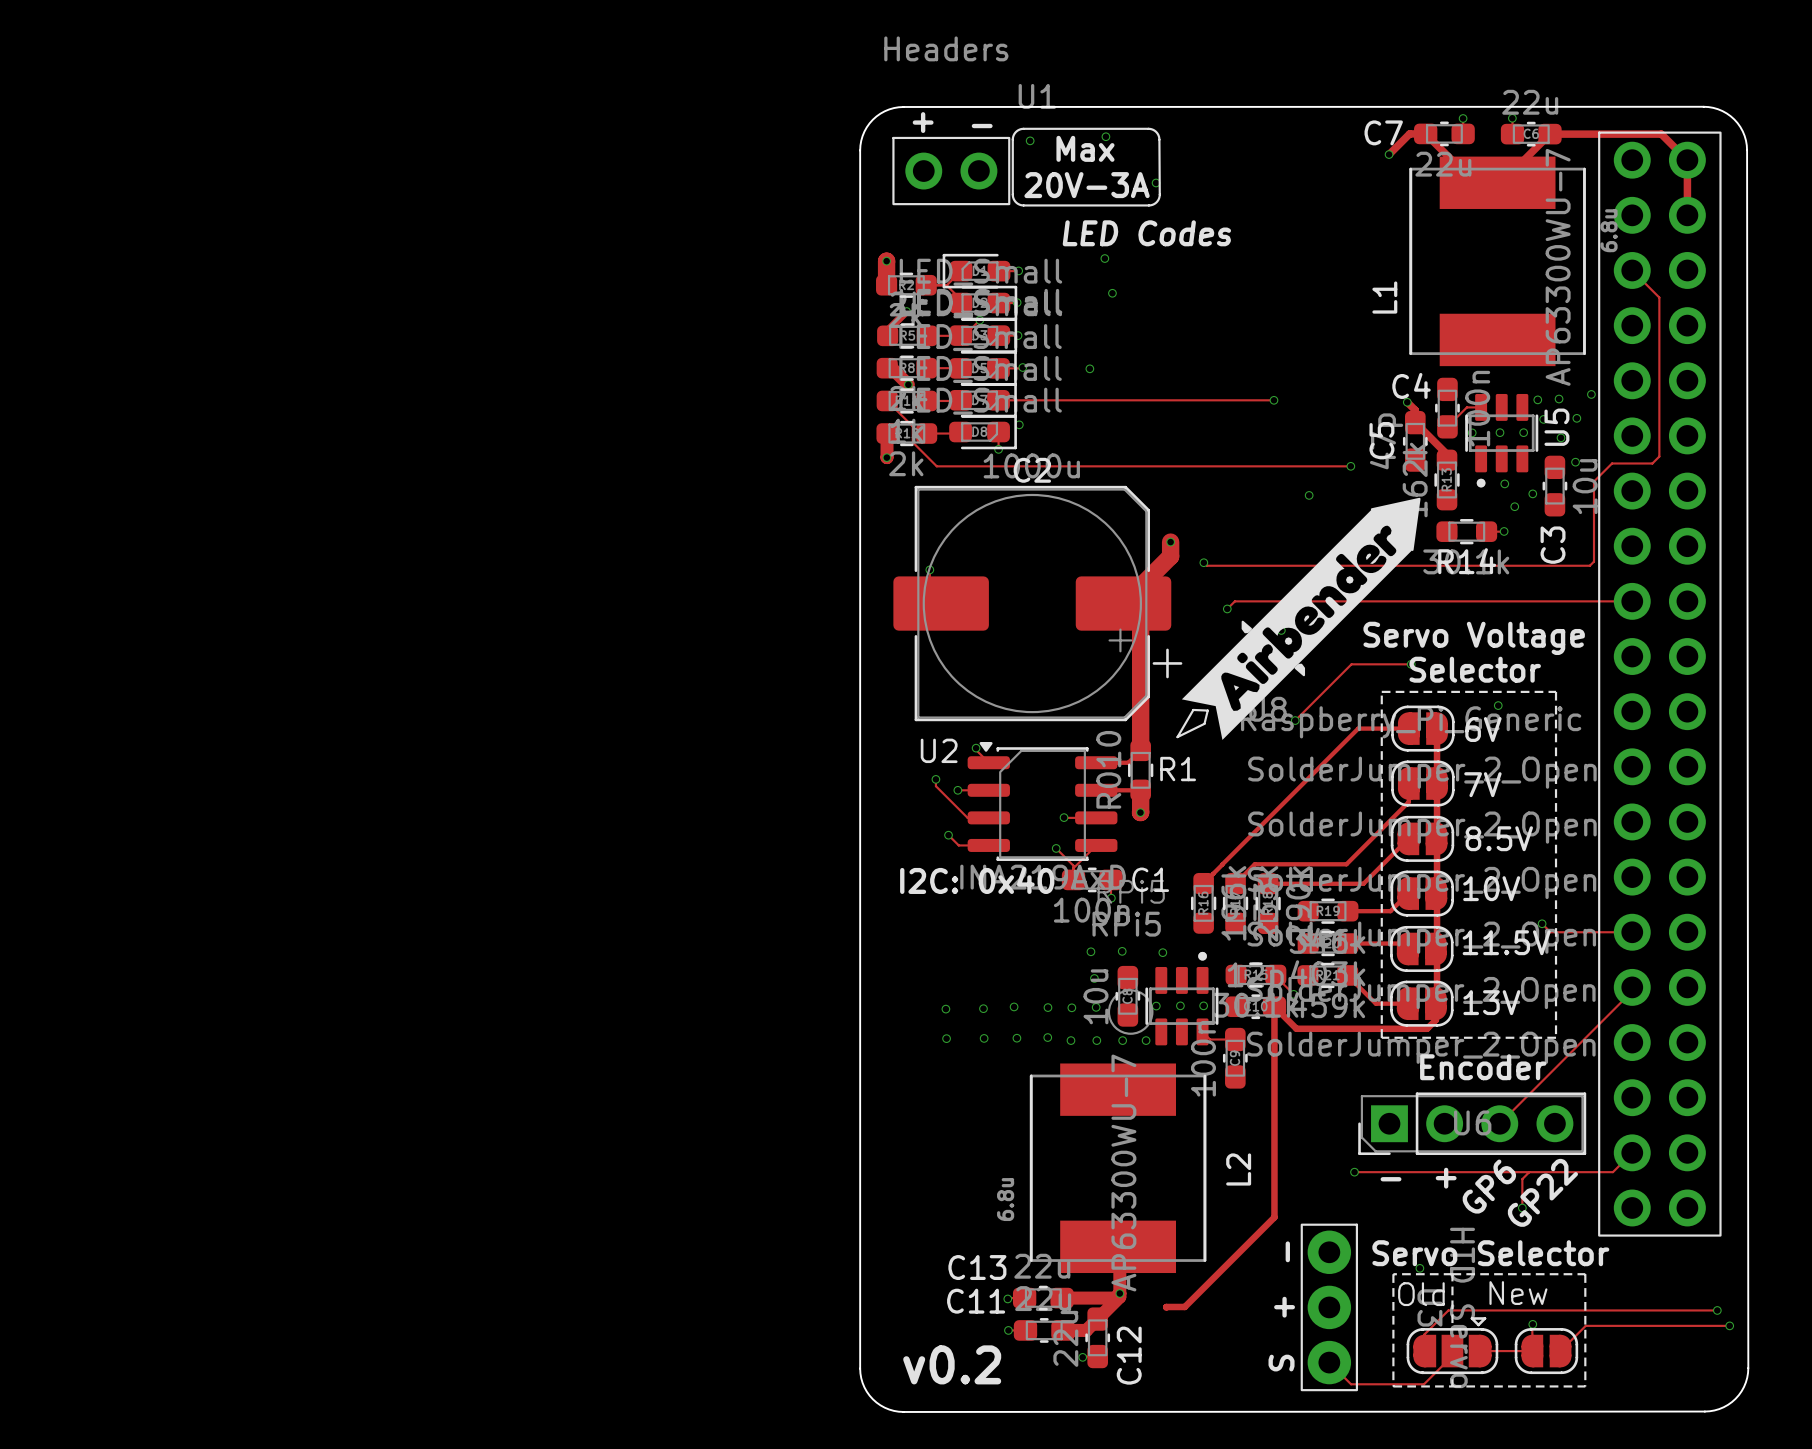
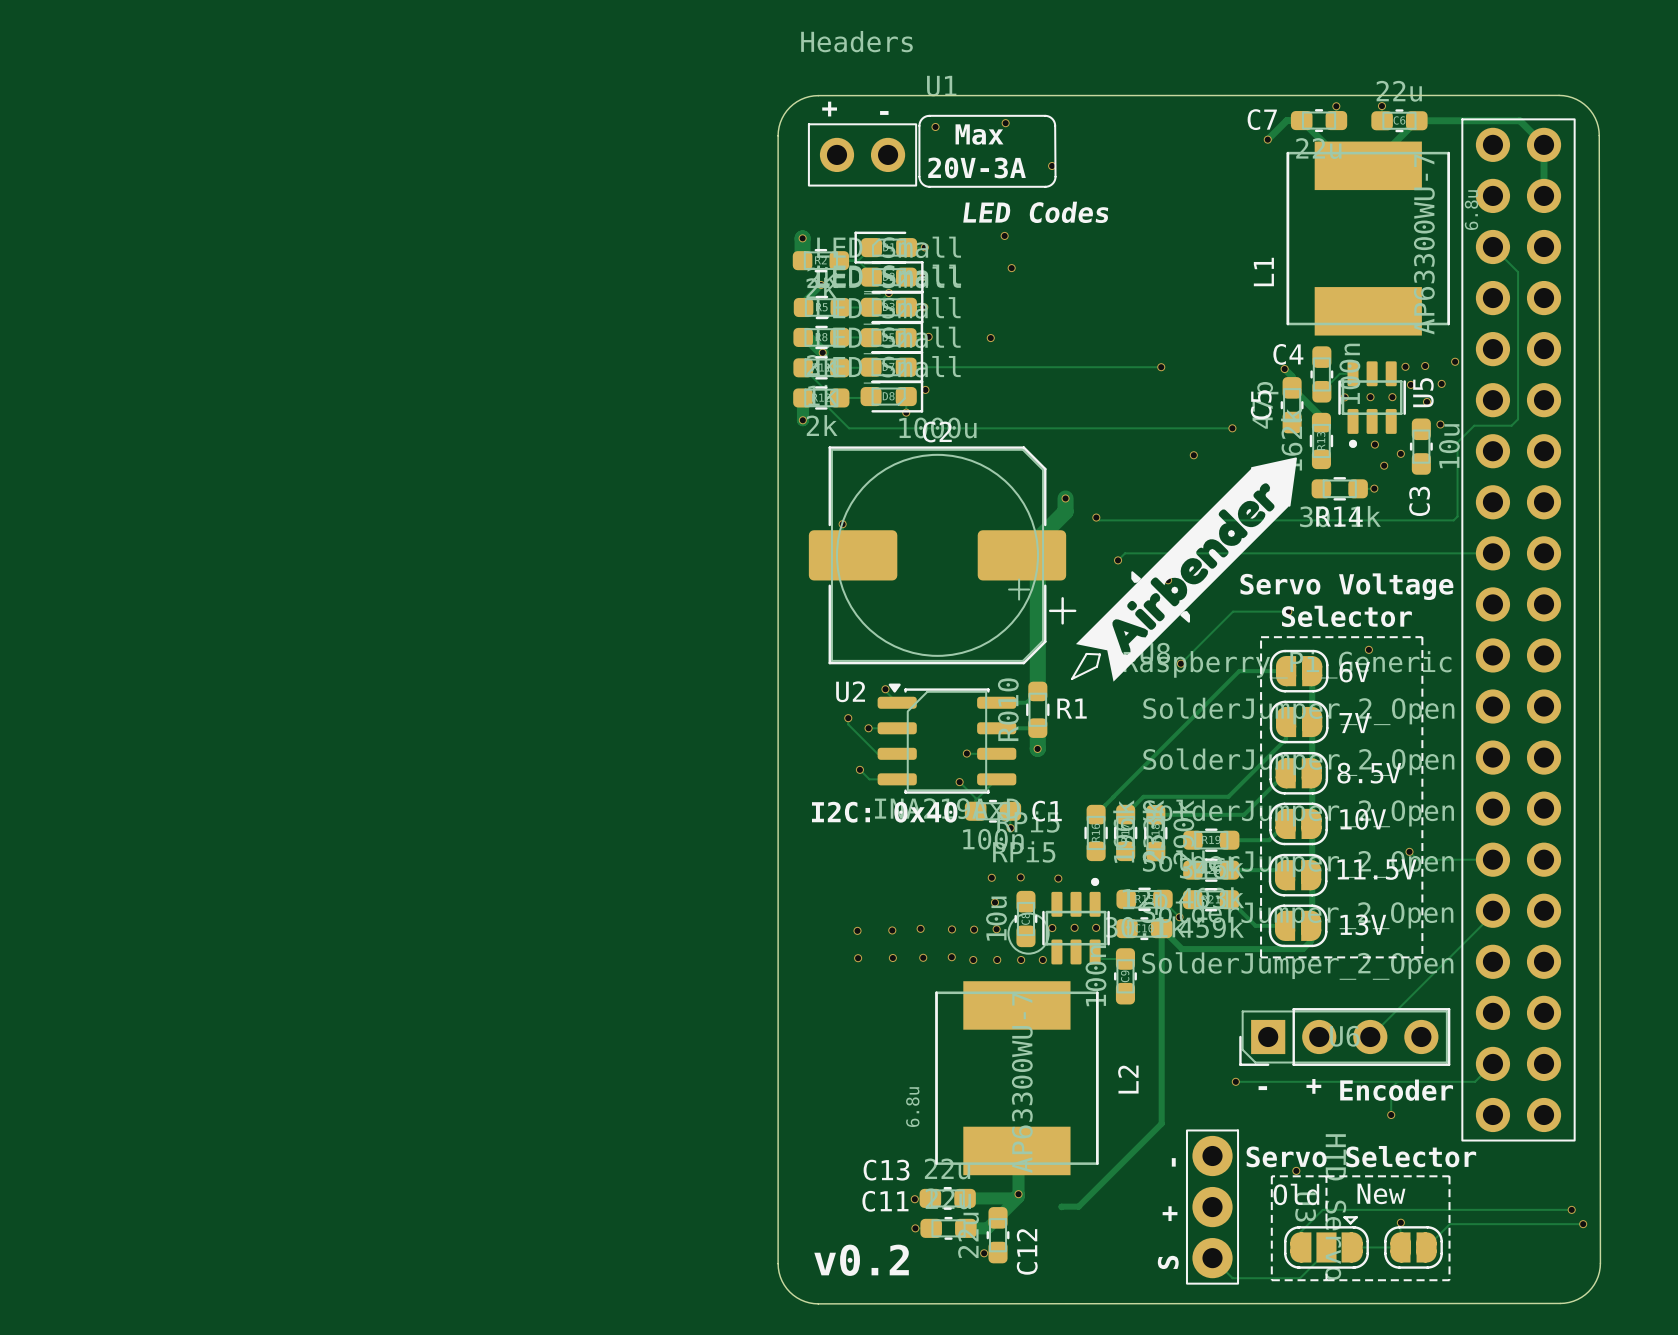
text position: Encoder (1483, 1067) -> Encoder (1396, 1090)
text: GP6 (1489, 1186) -> none
text: GP22 (1542, 1192) -> none

